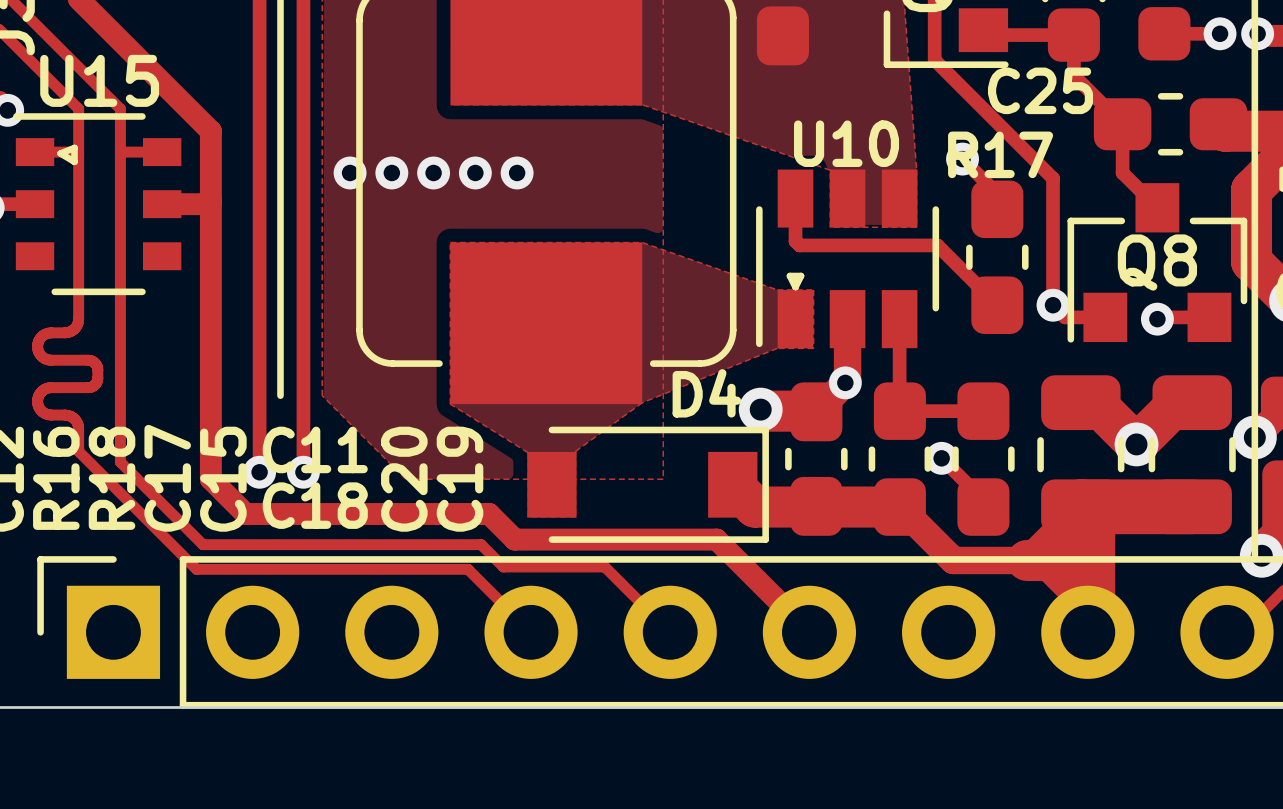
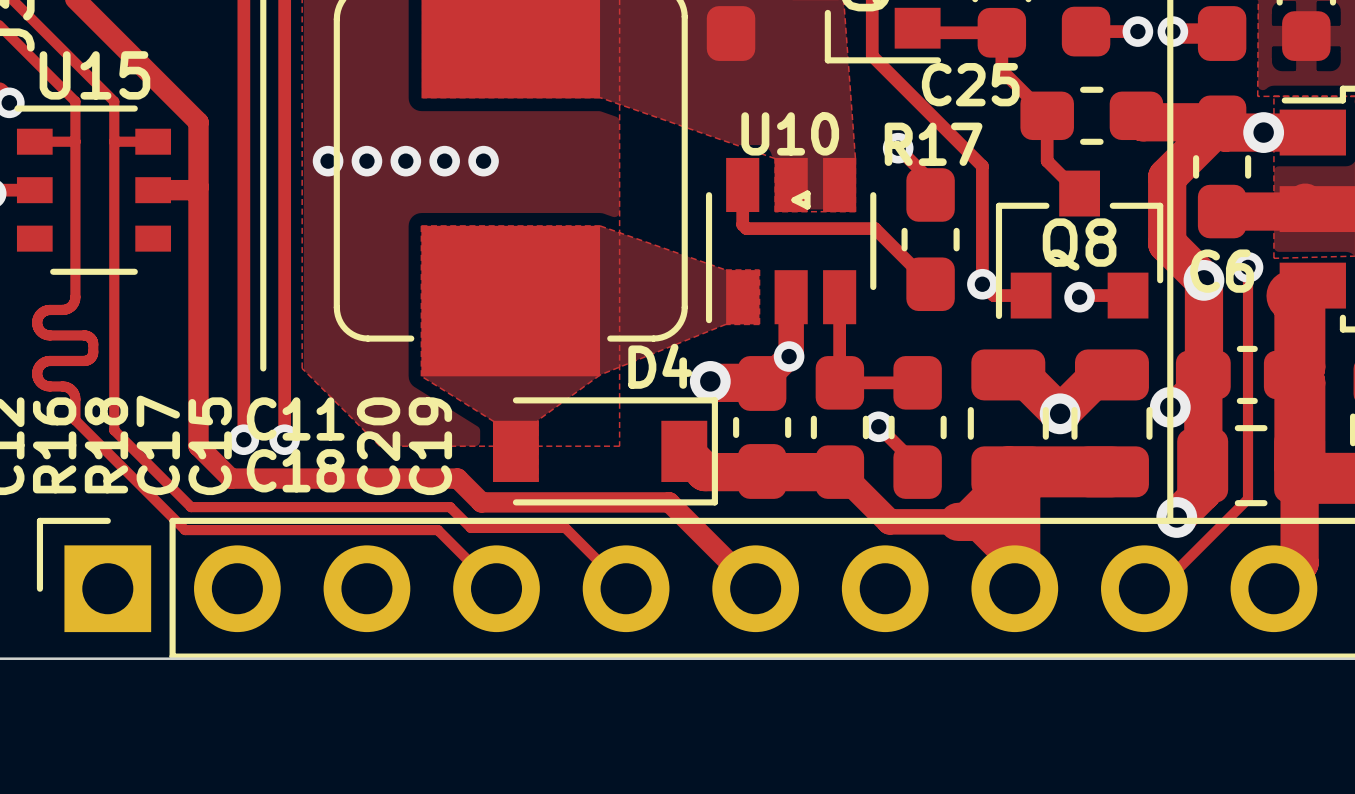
line: (74, 147) (74, 161) (60, 153) (74, 147) -> none
line: none -> (807, 193) (807, 206) (794, 200) (807, 193)
line: (789, 275) (801, 275) (795, 287) (789, 275) -> none

